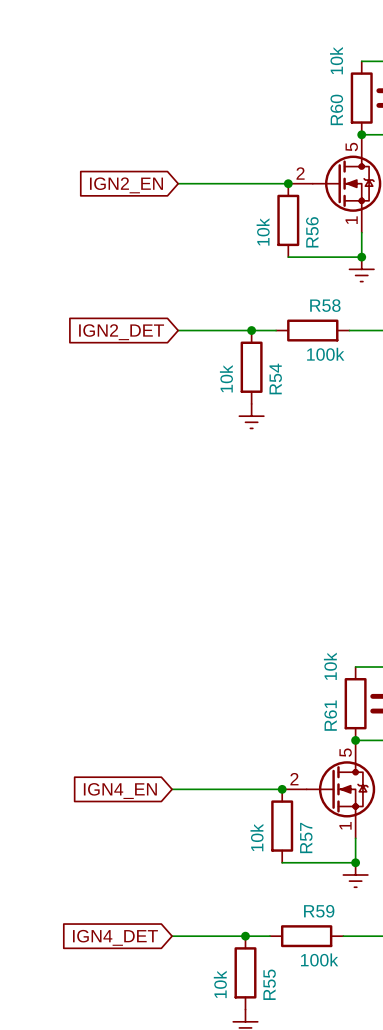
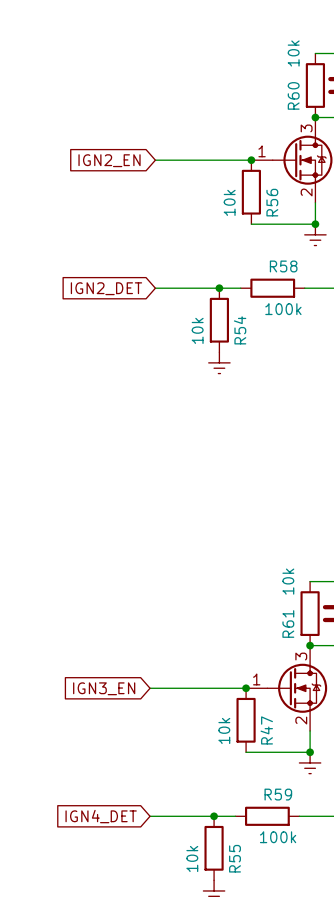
part pin number: 5 (351, 147) -> 3 (306, 128)
part pin number: 2 (300, 173) -> 1 (262, 151)
part pin number: 1 (351, 220) -> 2 (306, 192)
part pin number: 5 (345, 752) -> 3 (301, 656)
part pin number: 2 (294, 779) -> 1 (256, 679)
global label: IGN4_EN (120, 791) -> IGN3_EN (104, 688)
part pin number: 1 (345, 825) -> 2 (301, 720)
R57 name: R57 (306, 838) -> R47 (266, 730)

